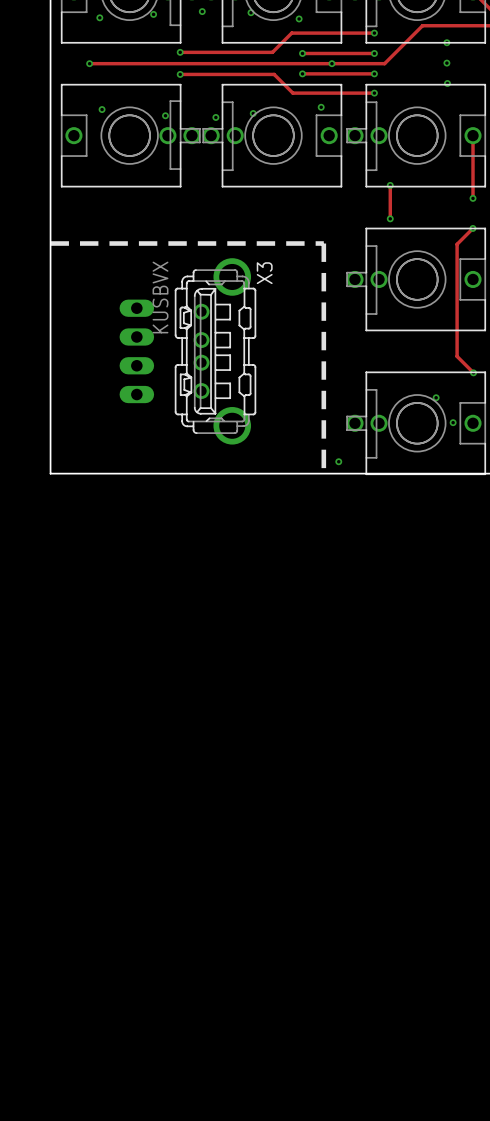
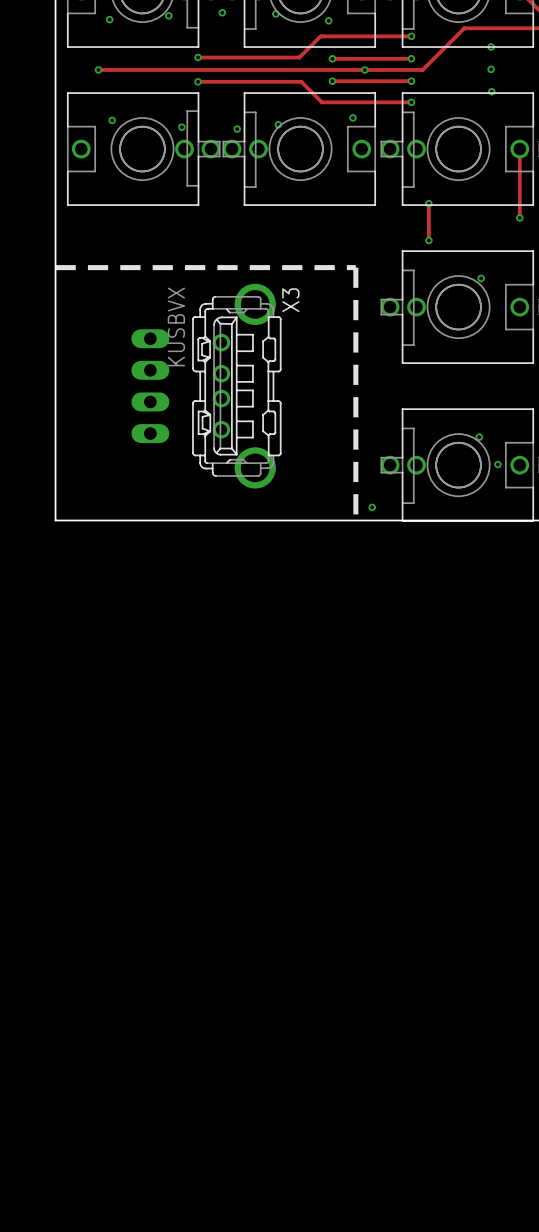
track: (472, 228) (457, 244) (457, 356) (473, 372) -> none
via position: (472, 228) -> (481, 278)
via: (473, 372) -> none

